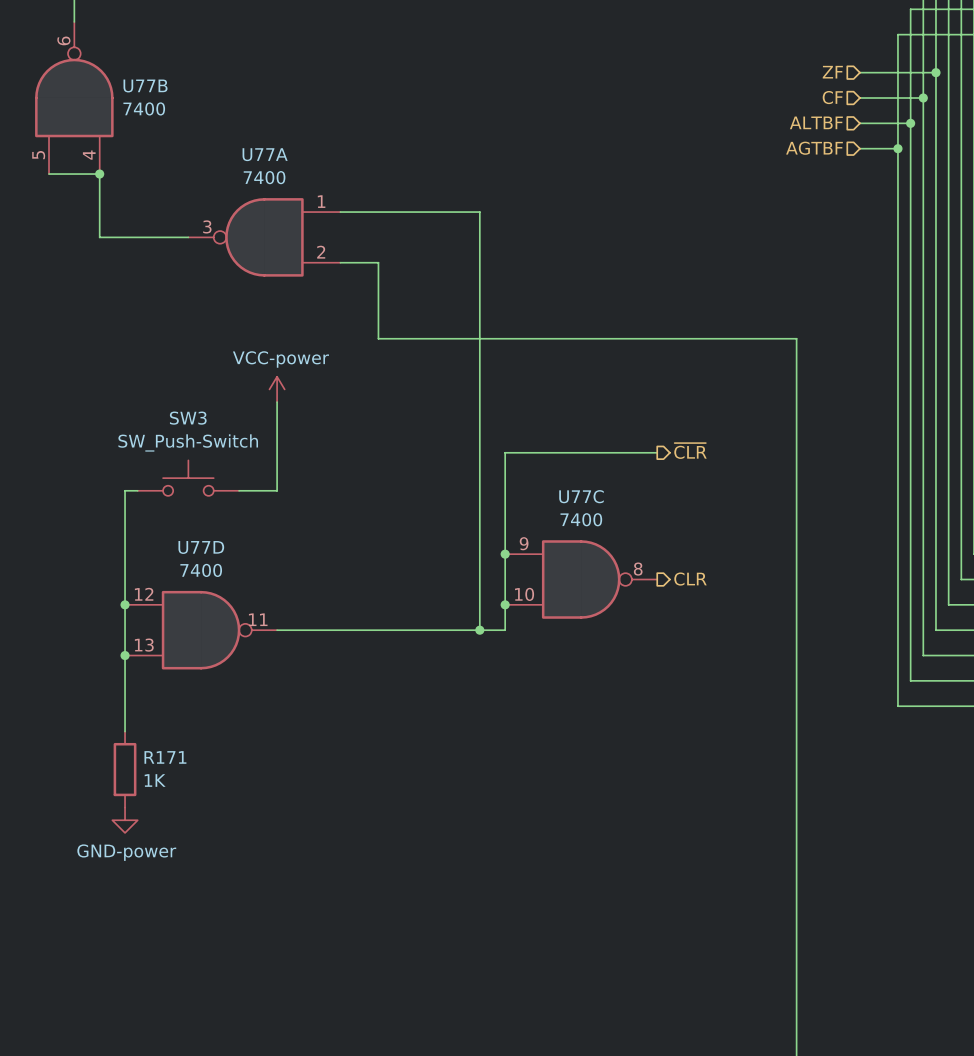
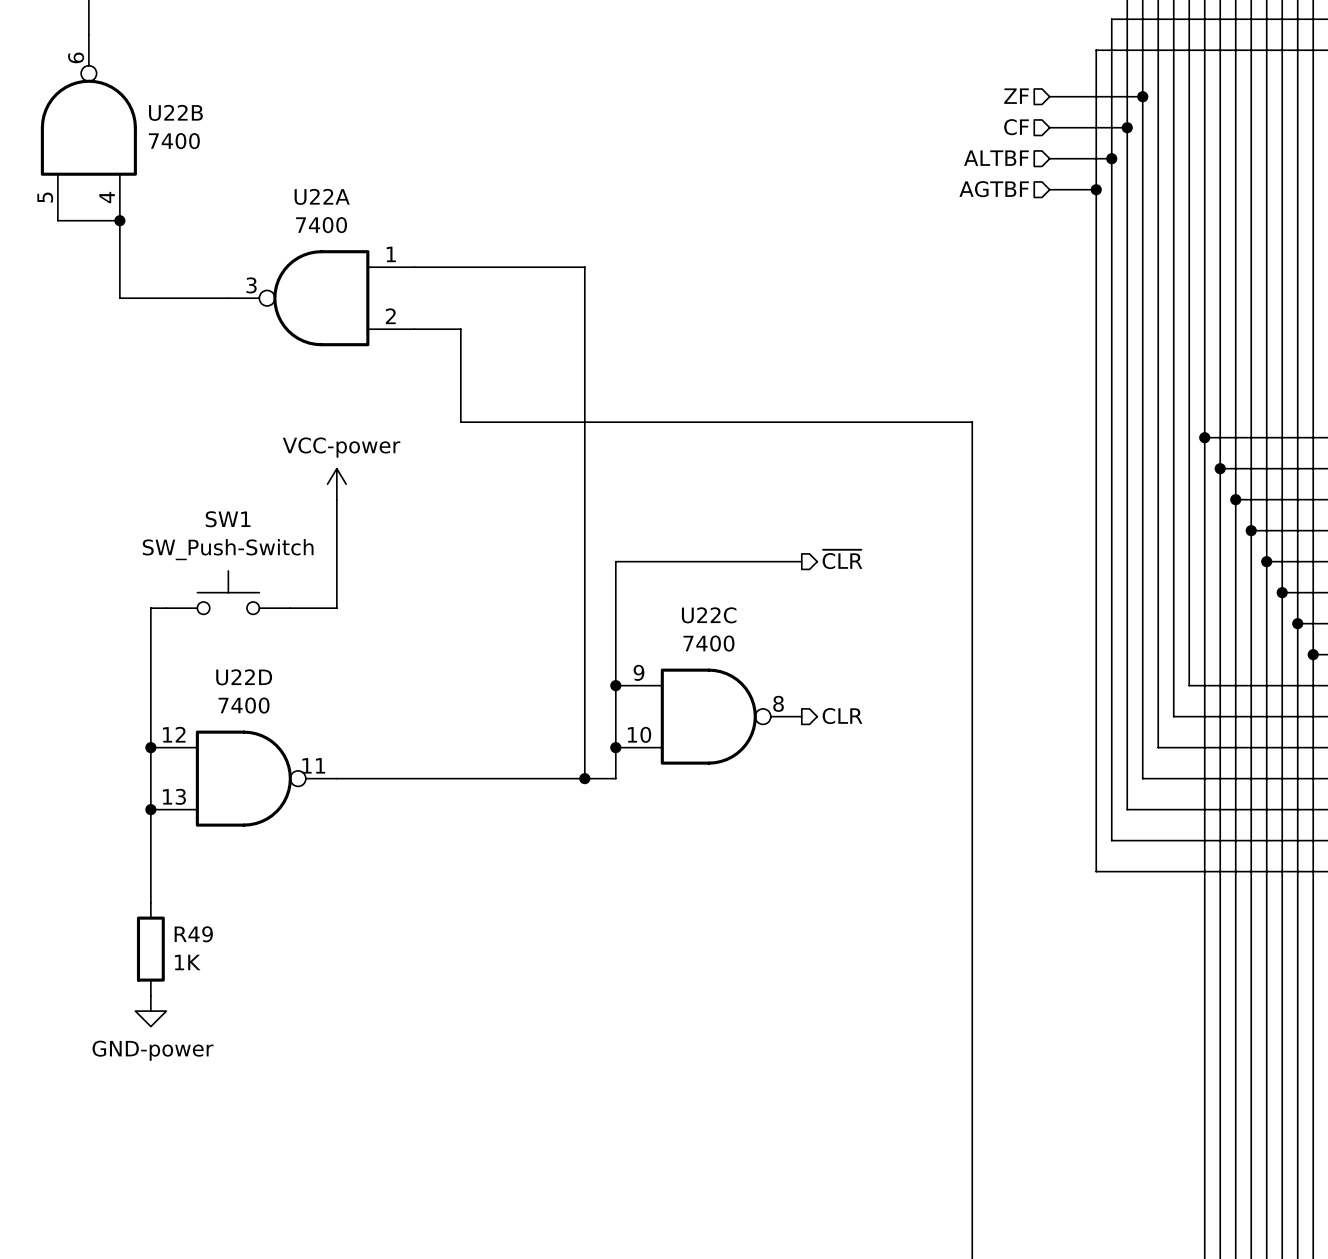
U77B name: U77B (145, 85) -> U22B (175, 112)
U77A name: U77A (265, 154) -> U22A (322, 196)
SW3 name: SW3 (188, 418) -> SW1 (228, 519)
U77C name: U77C (581, 496) -> U22C (709, 615)
U77D name: U77D (201, 547) -> U22D (244, 677)
R171 name: R171 (165, 757) -> R49 (193, 934)

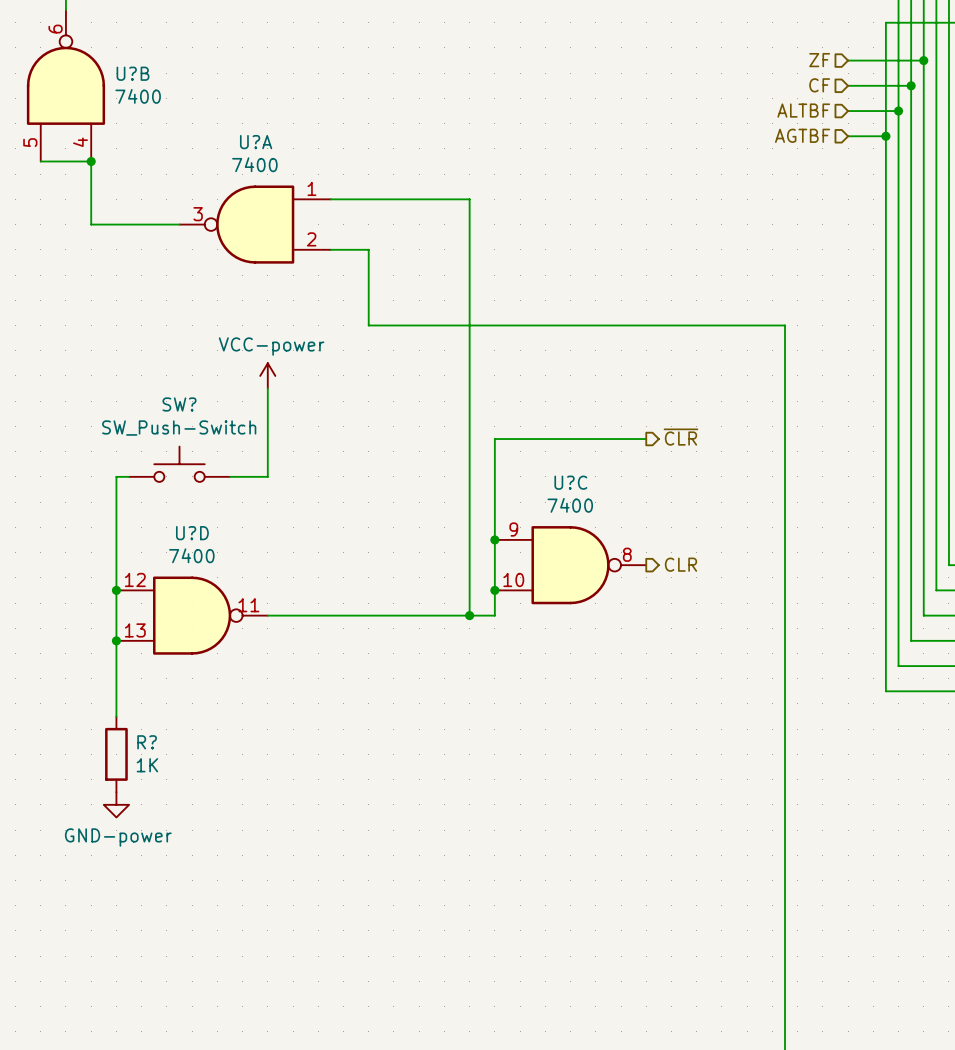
U22B name: U22B (175, 112) -> U?B (133, 73)
U22A name: U22A (322, 196) -> U?A (256, 142)
SW1 name: SW1 (228, 519) -> SW? (179, 404)
U22C name: U22C (709, 615) -> U?C (570, 482)
U22D name: U22D (244, 677) -> U?D (192, 533)
R49 name: R49 (193, 934) -> R? (147, 742)

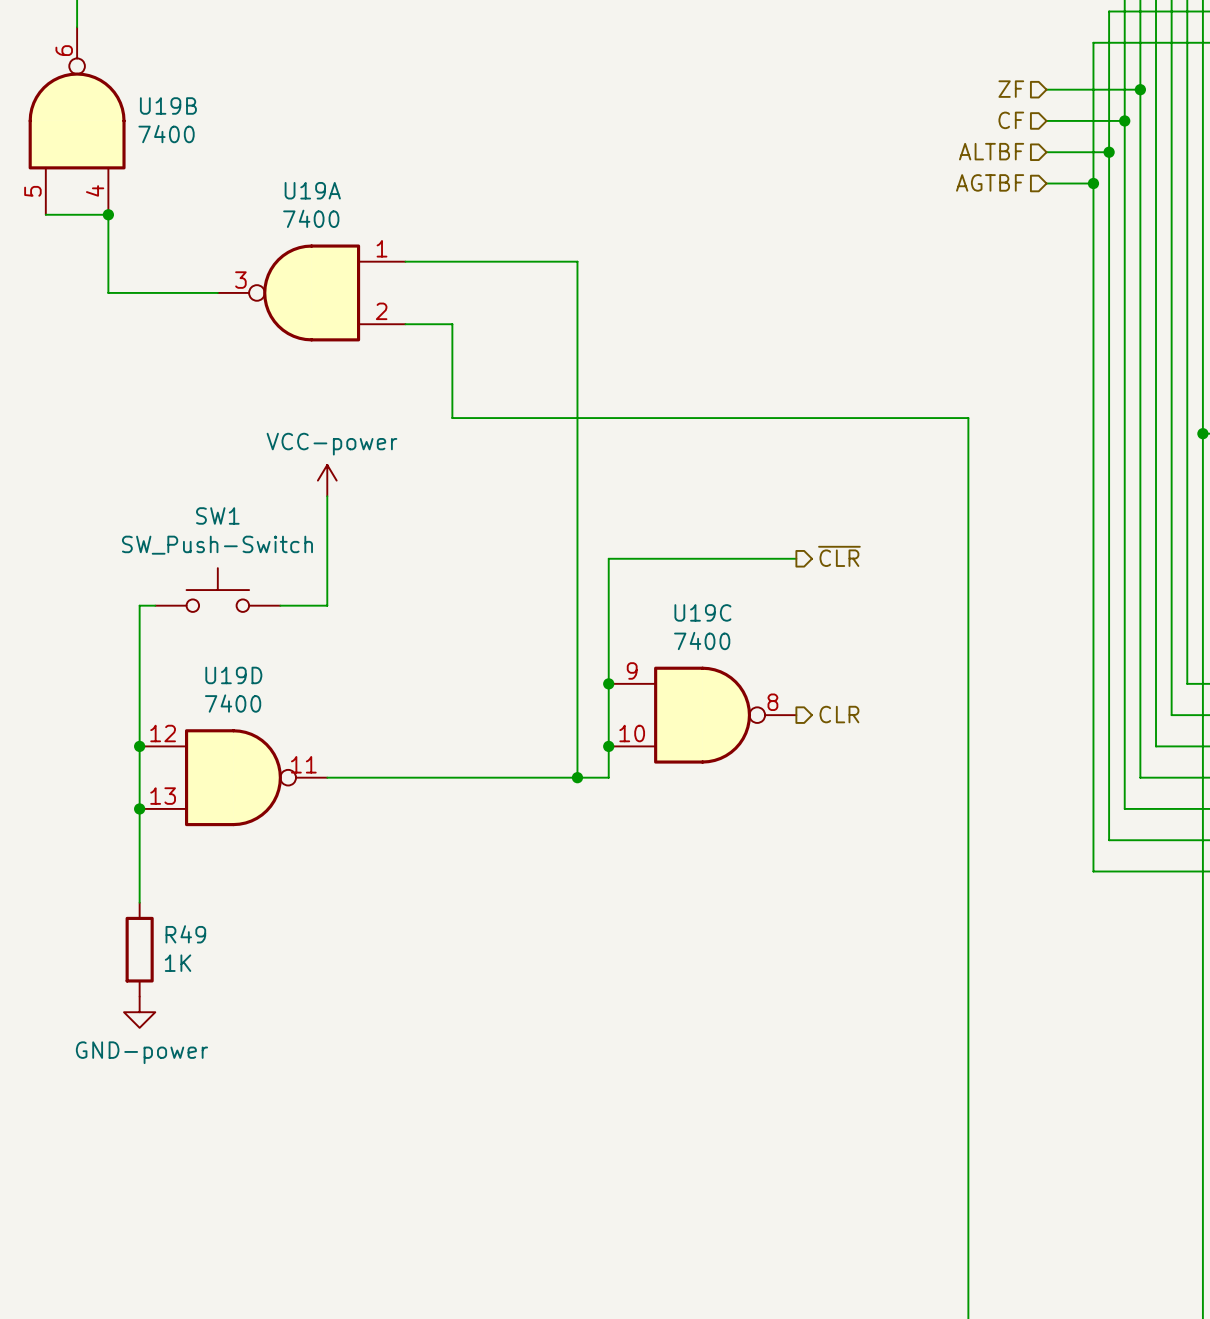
U?B name: U?B (133, 73) -> U19B (168, 105)
U?A name: U?A (256, 142) -> U19A (312, 190)
SW? name: SW? (179, 404) -> SW1 (217, 515)
U?C name: U?C (570, 482) -> U19C (702, 612)
U?D name: U?D (192, 533) -> U19D (233, 675)
R? name: R? (147, 742) -> R49 (185, 934)

